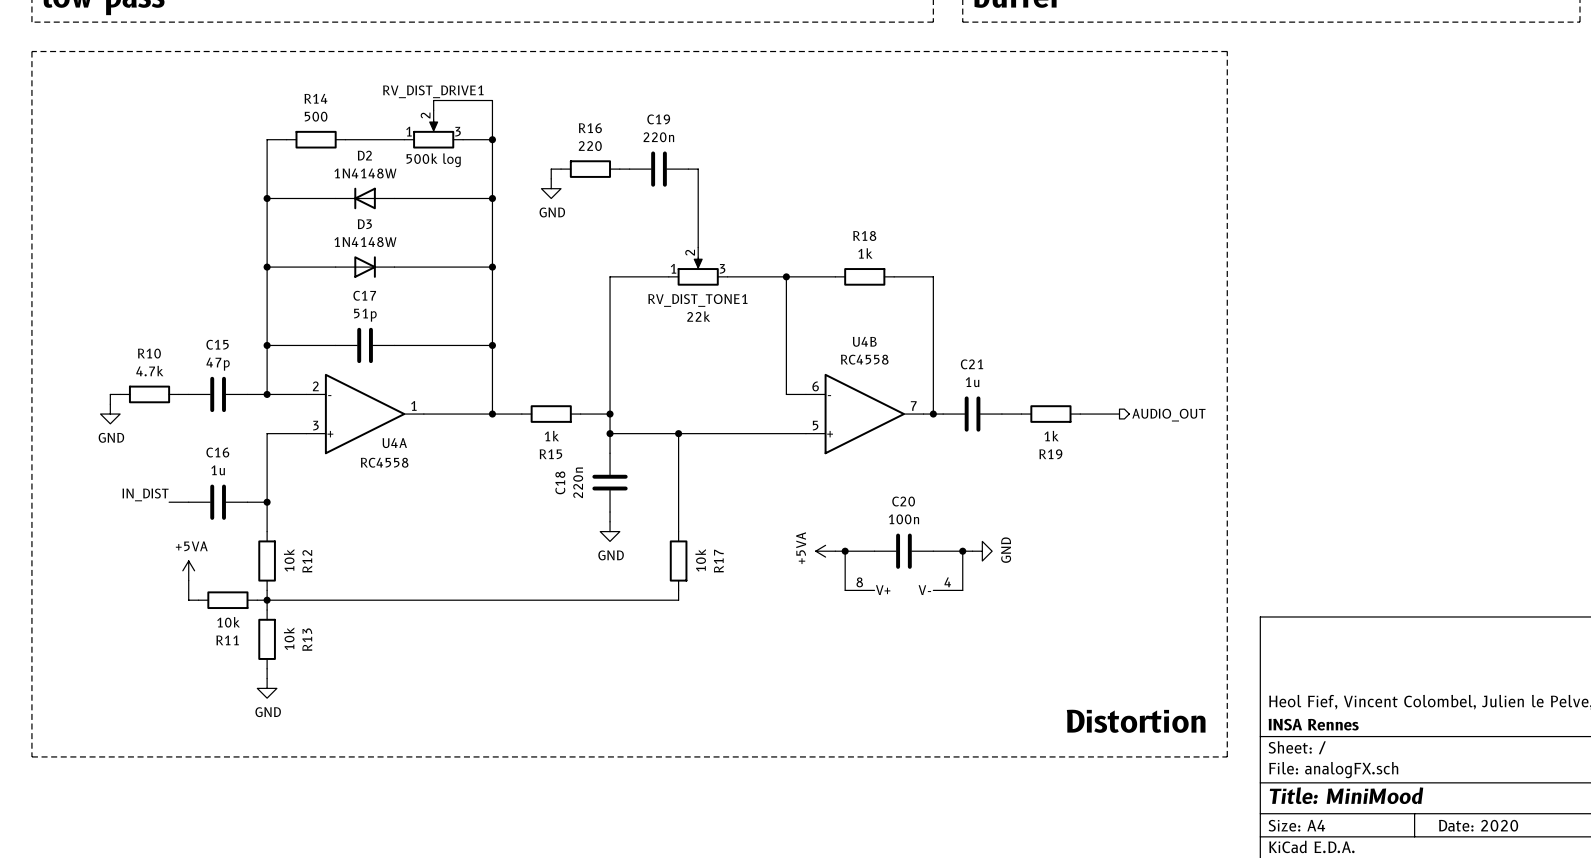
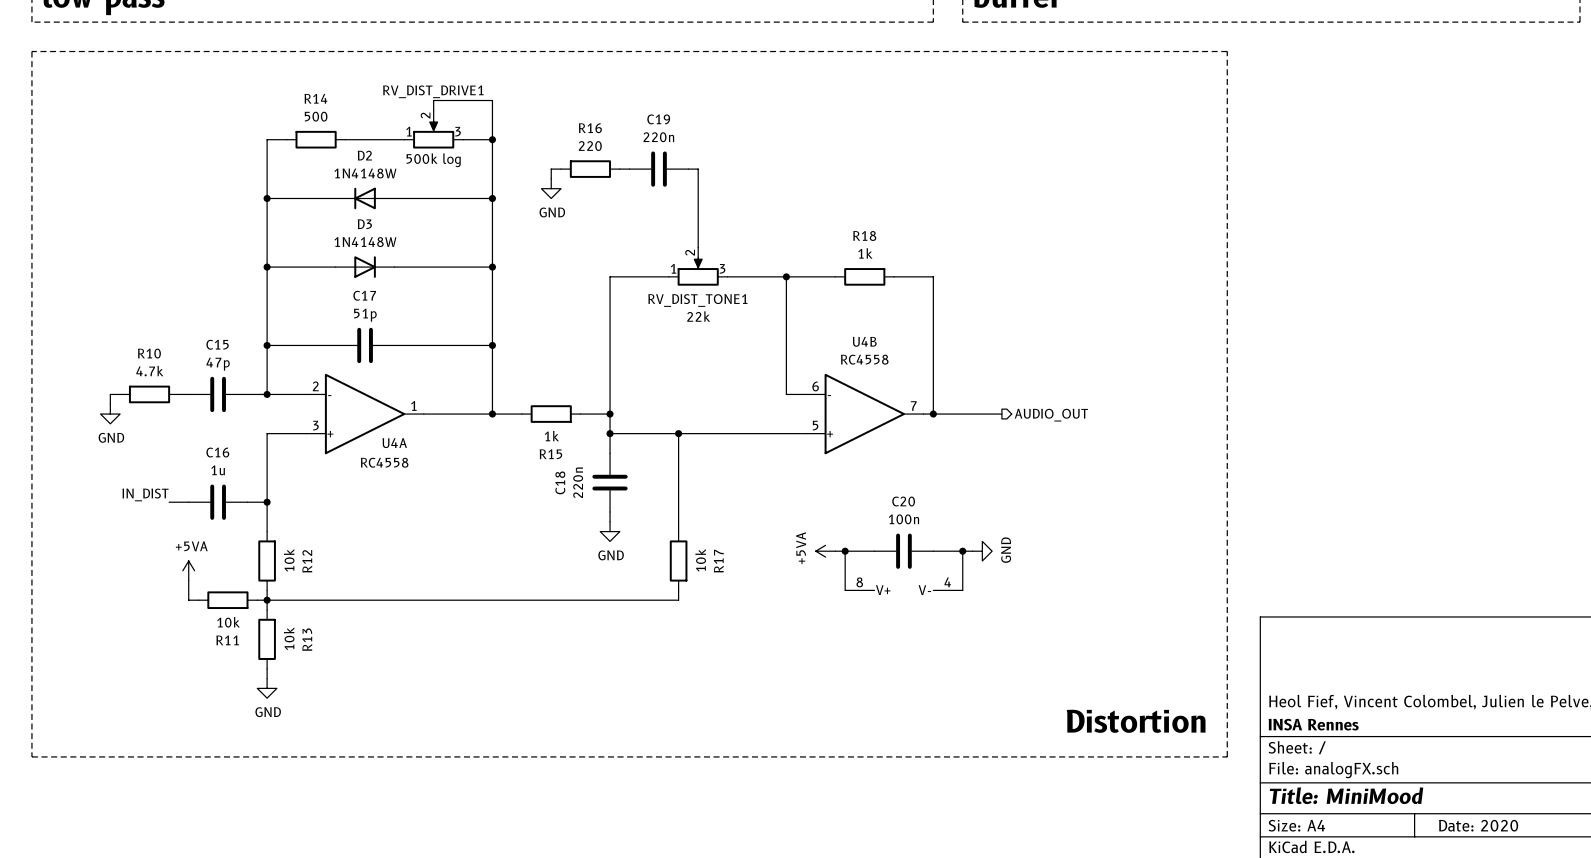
C21: 1u (972, 414) -> none
R19: 1k (1050, 414) -> none
wire: (1080, 414) (1119, 414) -> none
hierarchical label position: AUDIO_OUT (1168, 415) -> AUDIO_OUT (1051, 415)

